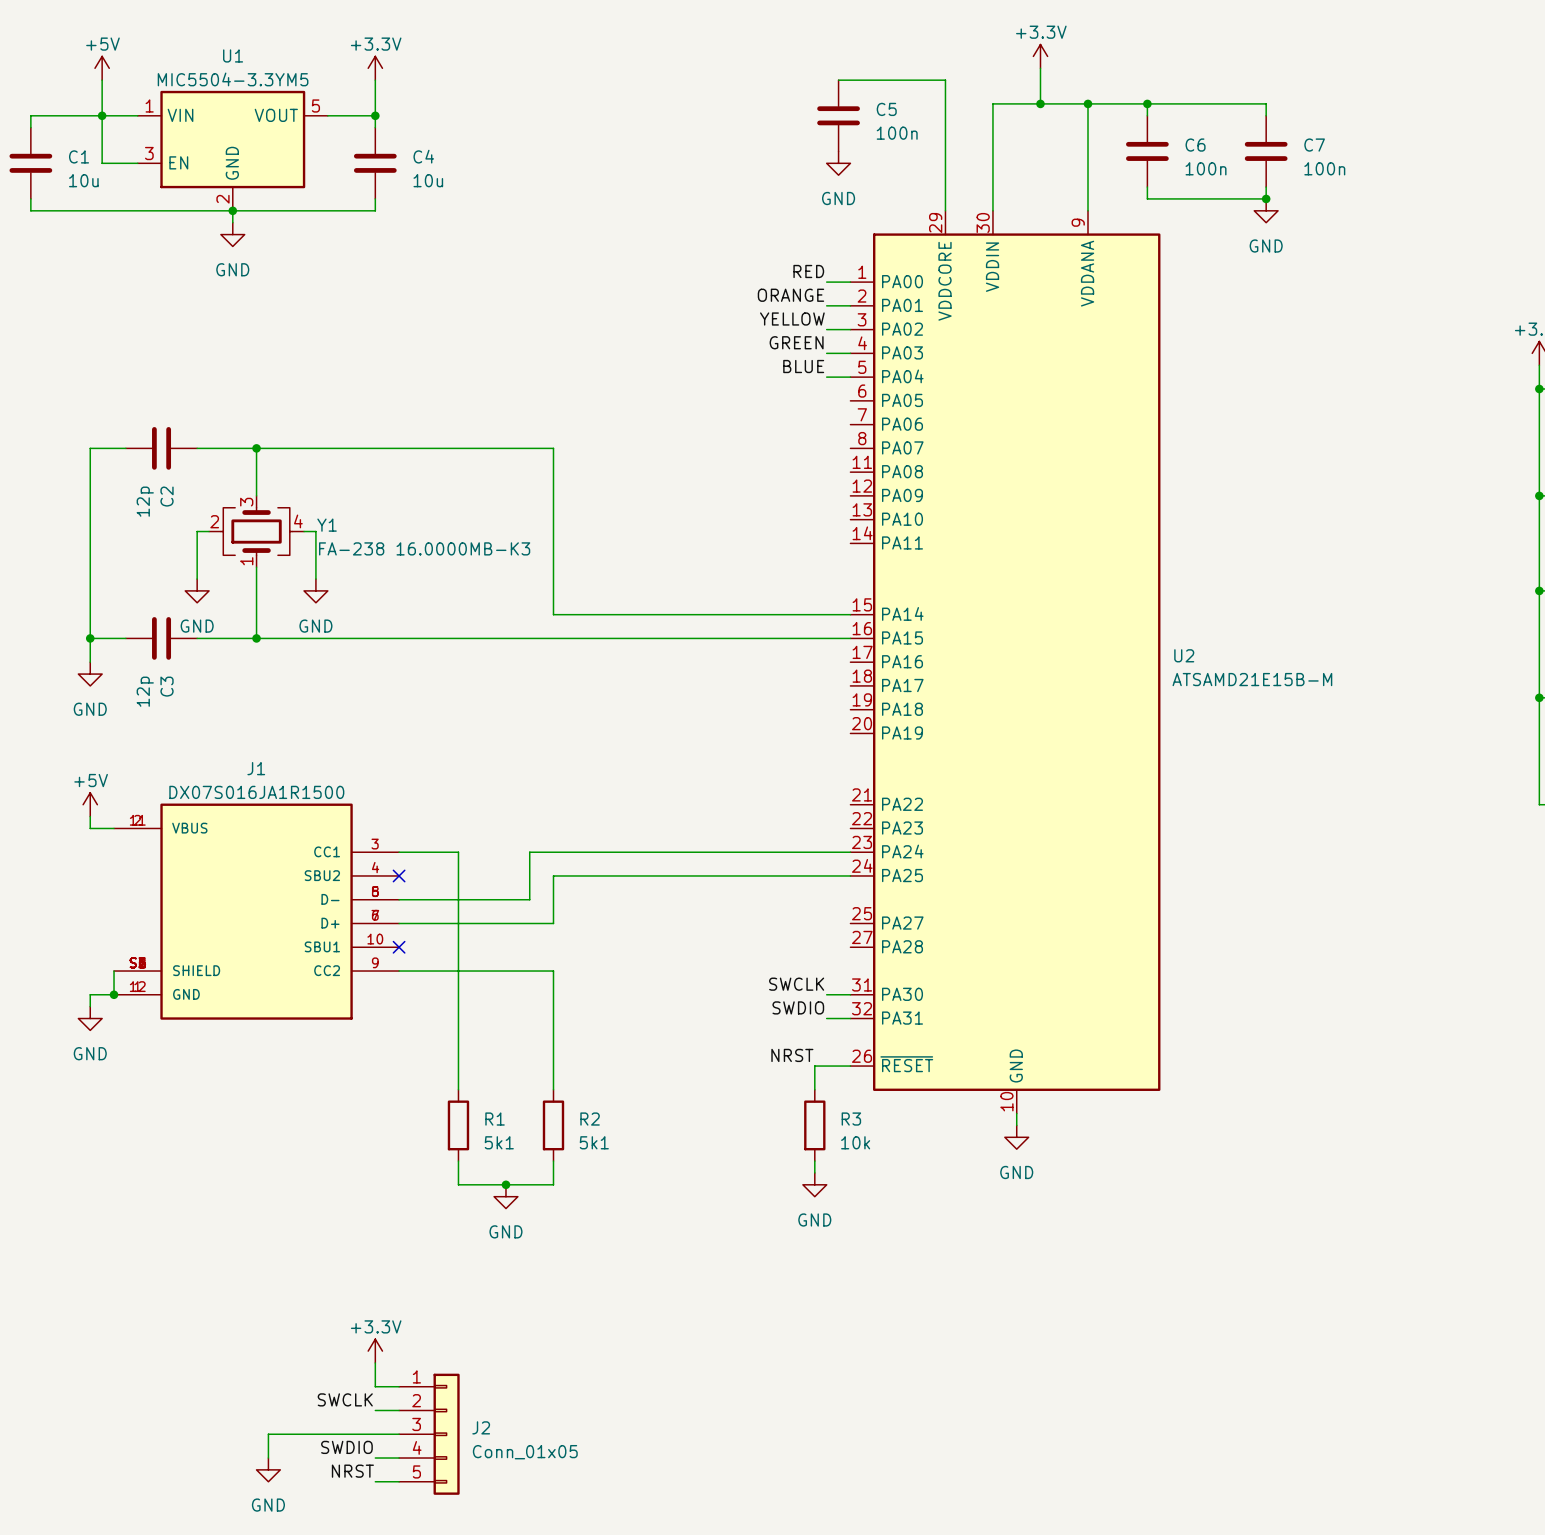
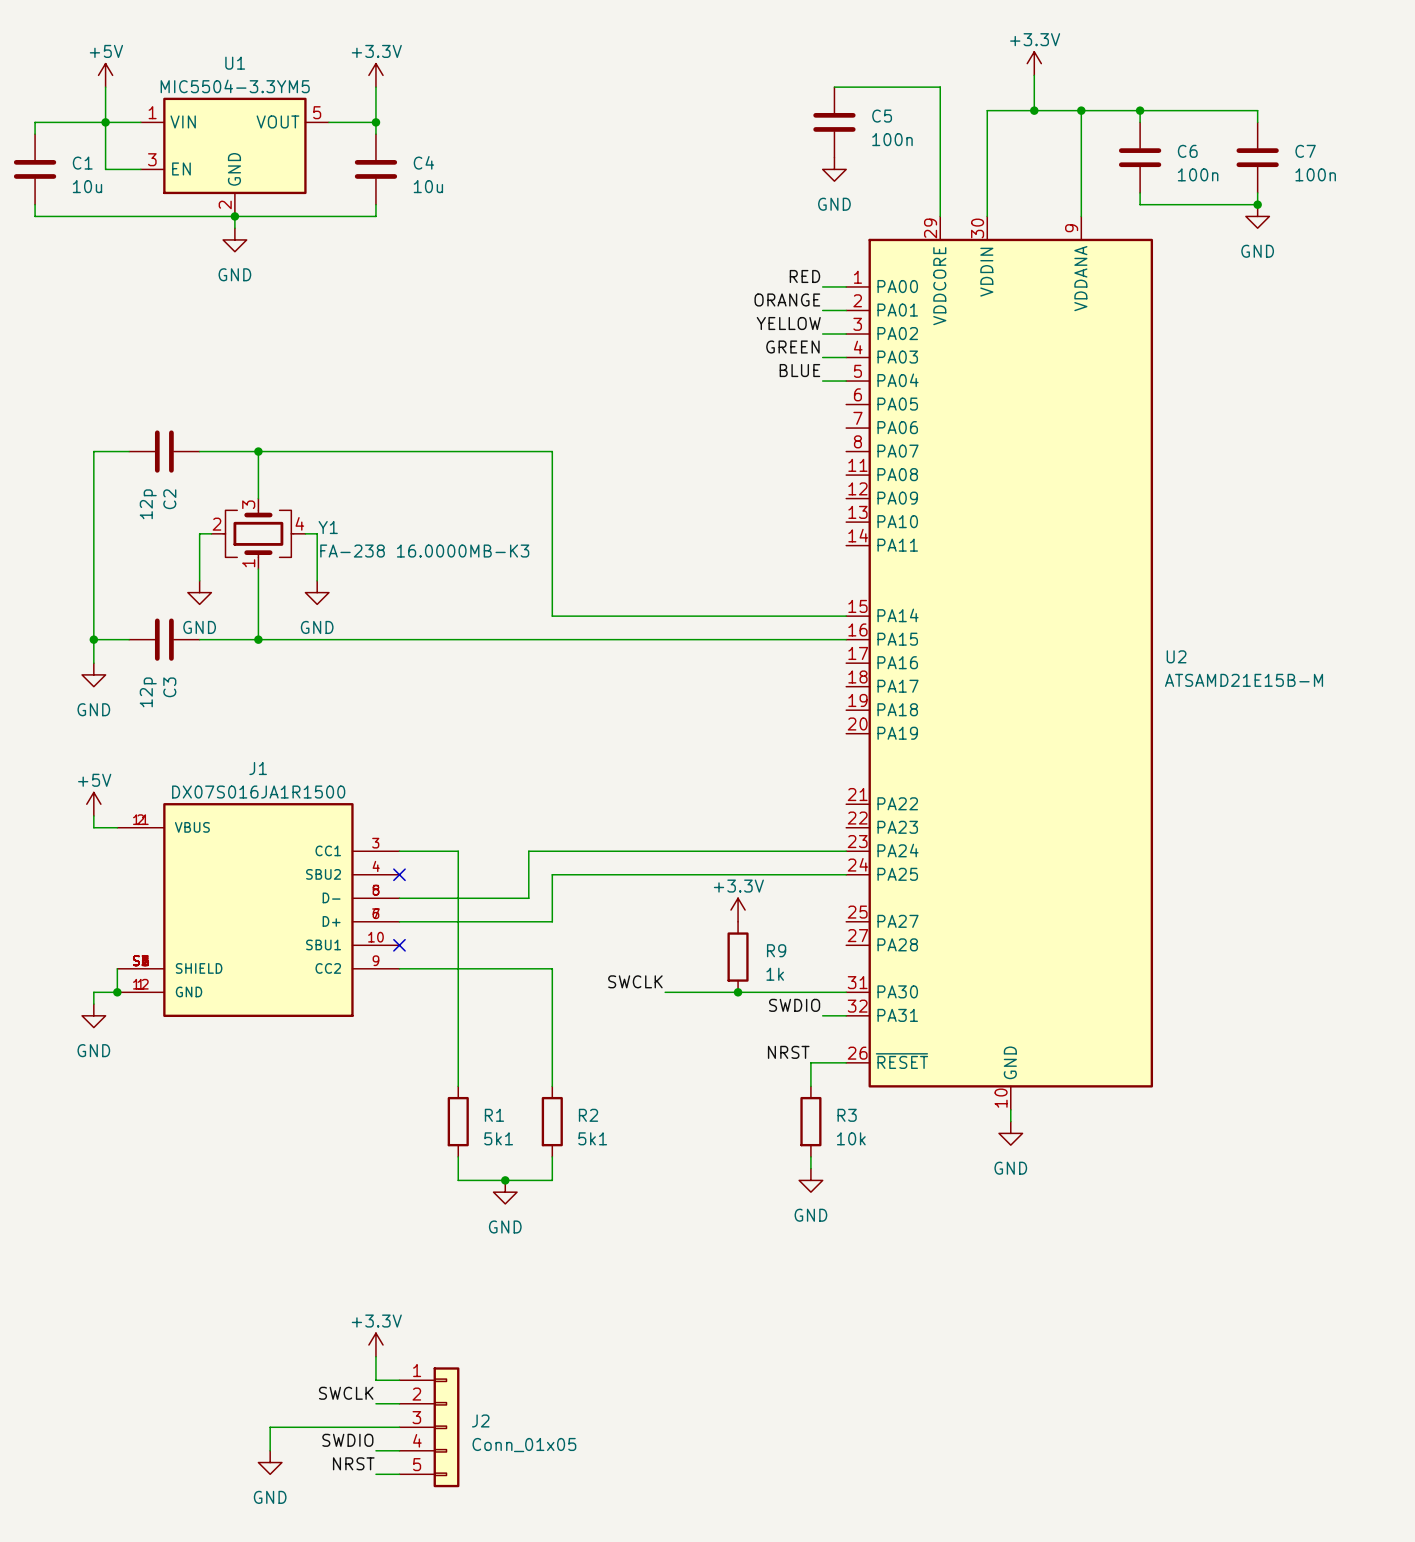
power symbol: none -> +3.3V (738, 910)
R9: none -> 1k (738, 957)
label position: SWCLK (796, 984) -> SWCLK (635, 981)
wire: none -> (665, 992) (822, 992)
junction: none -> (738, 992)

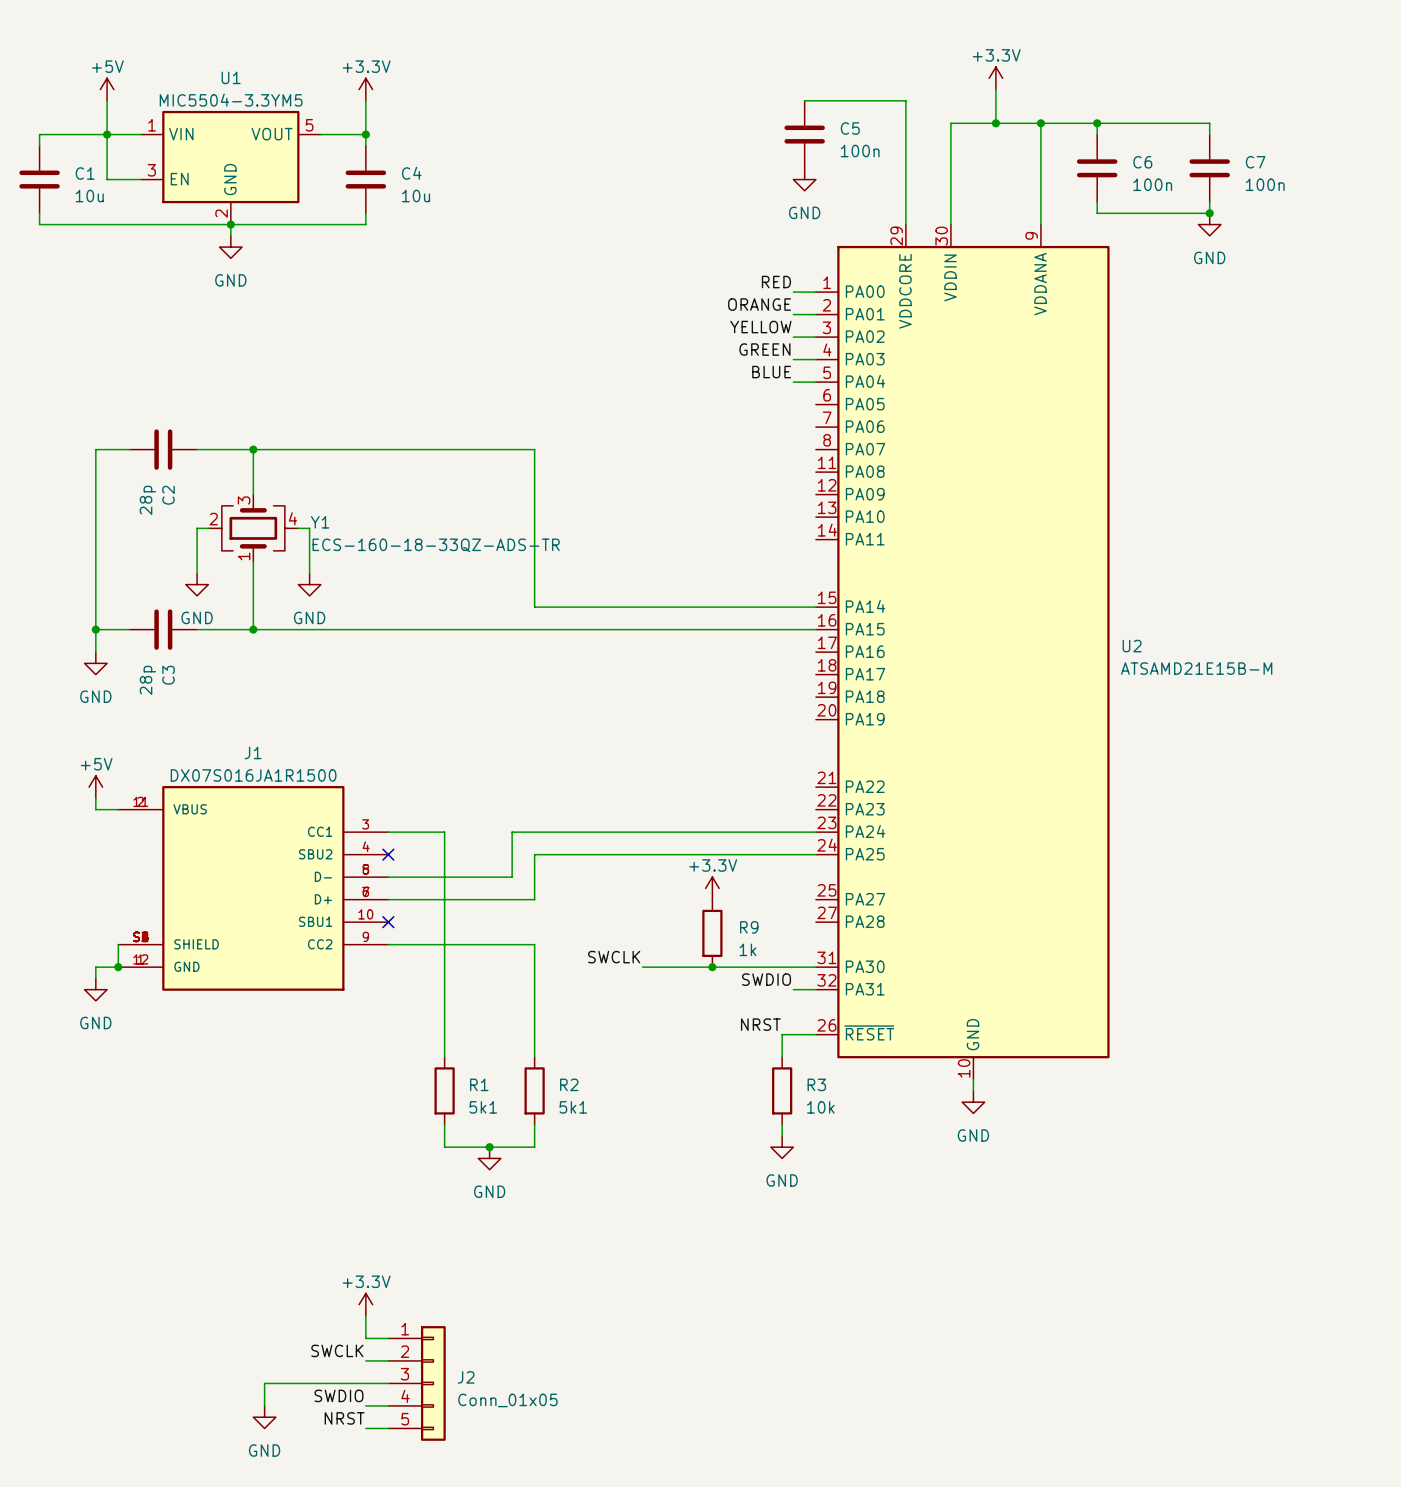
C2 value: 12p (148, 504) -> 28p (147, 500)
Y1 value: FA-238 16.0000MB-K3 (424, 551) -> ECS-160-18-33QZ-ADS-TR (436, 545)
C3 value: 12p (148, 692) -> 28p (147, 680)

